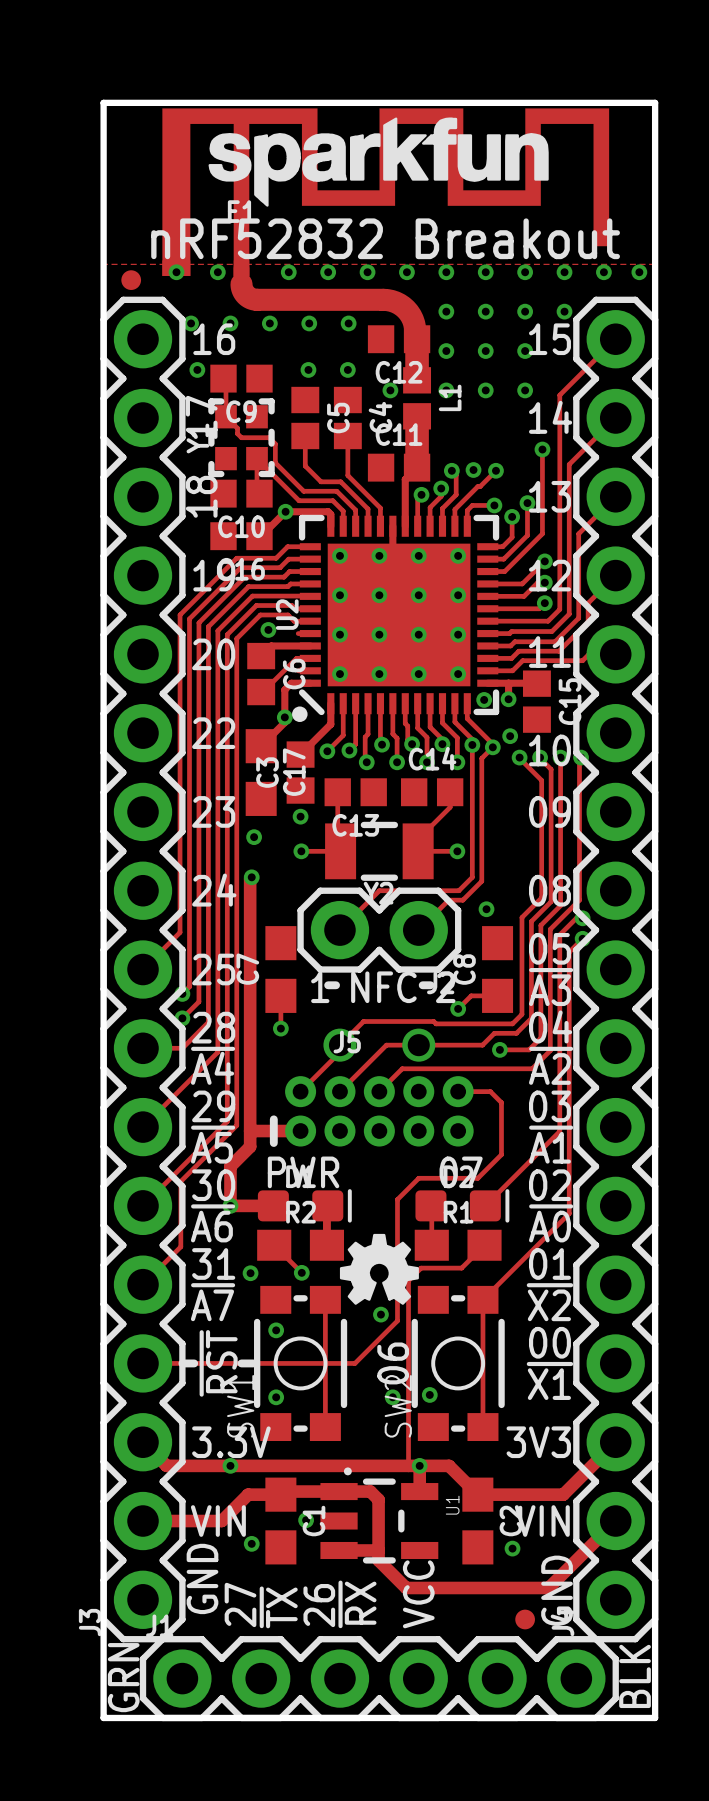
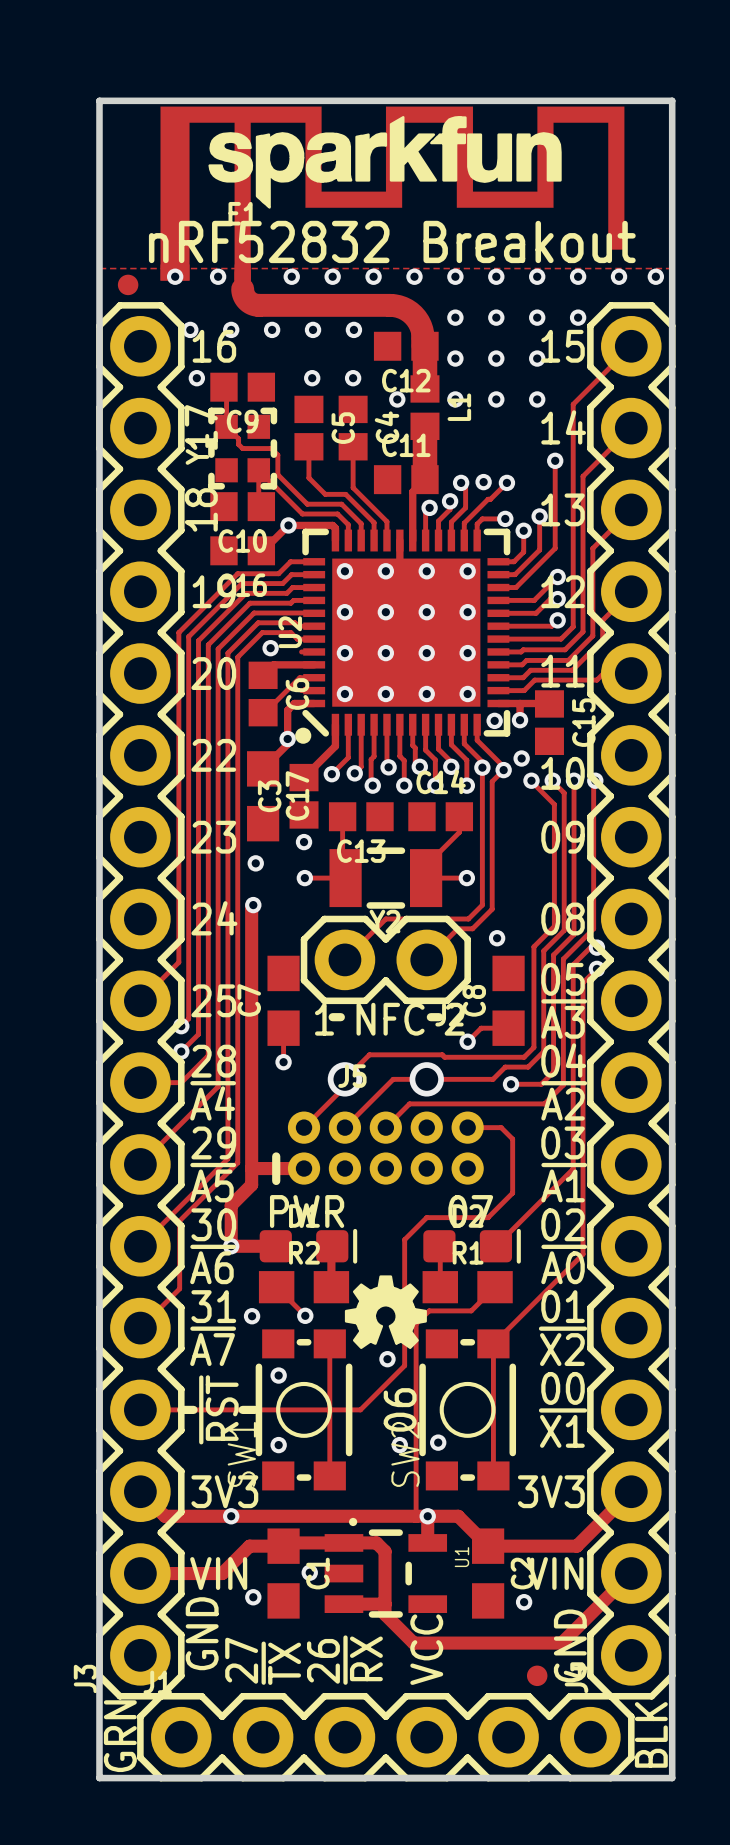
text: 3.3V (231, 1442) -> 3V3 (224, 1491)

